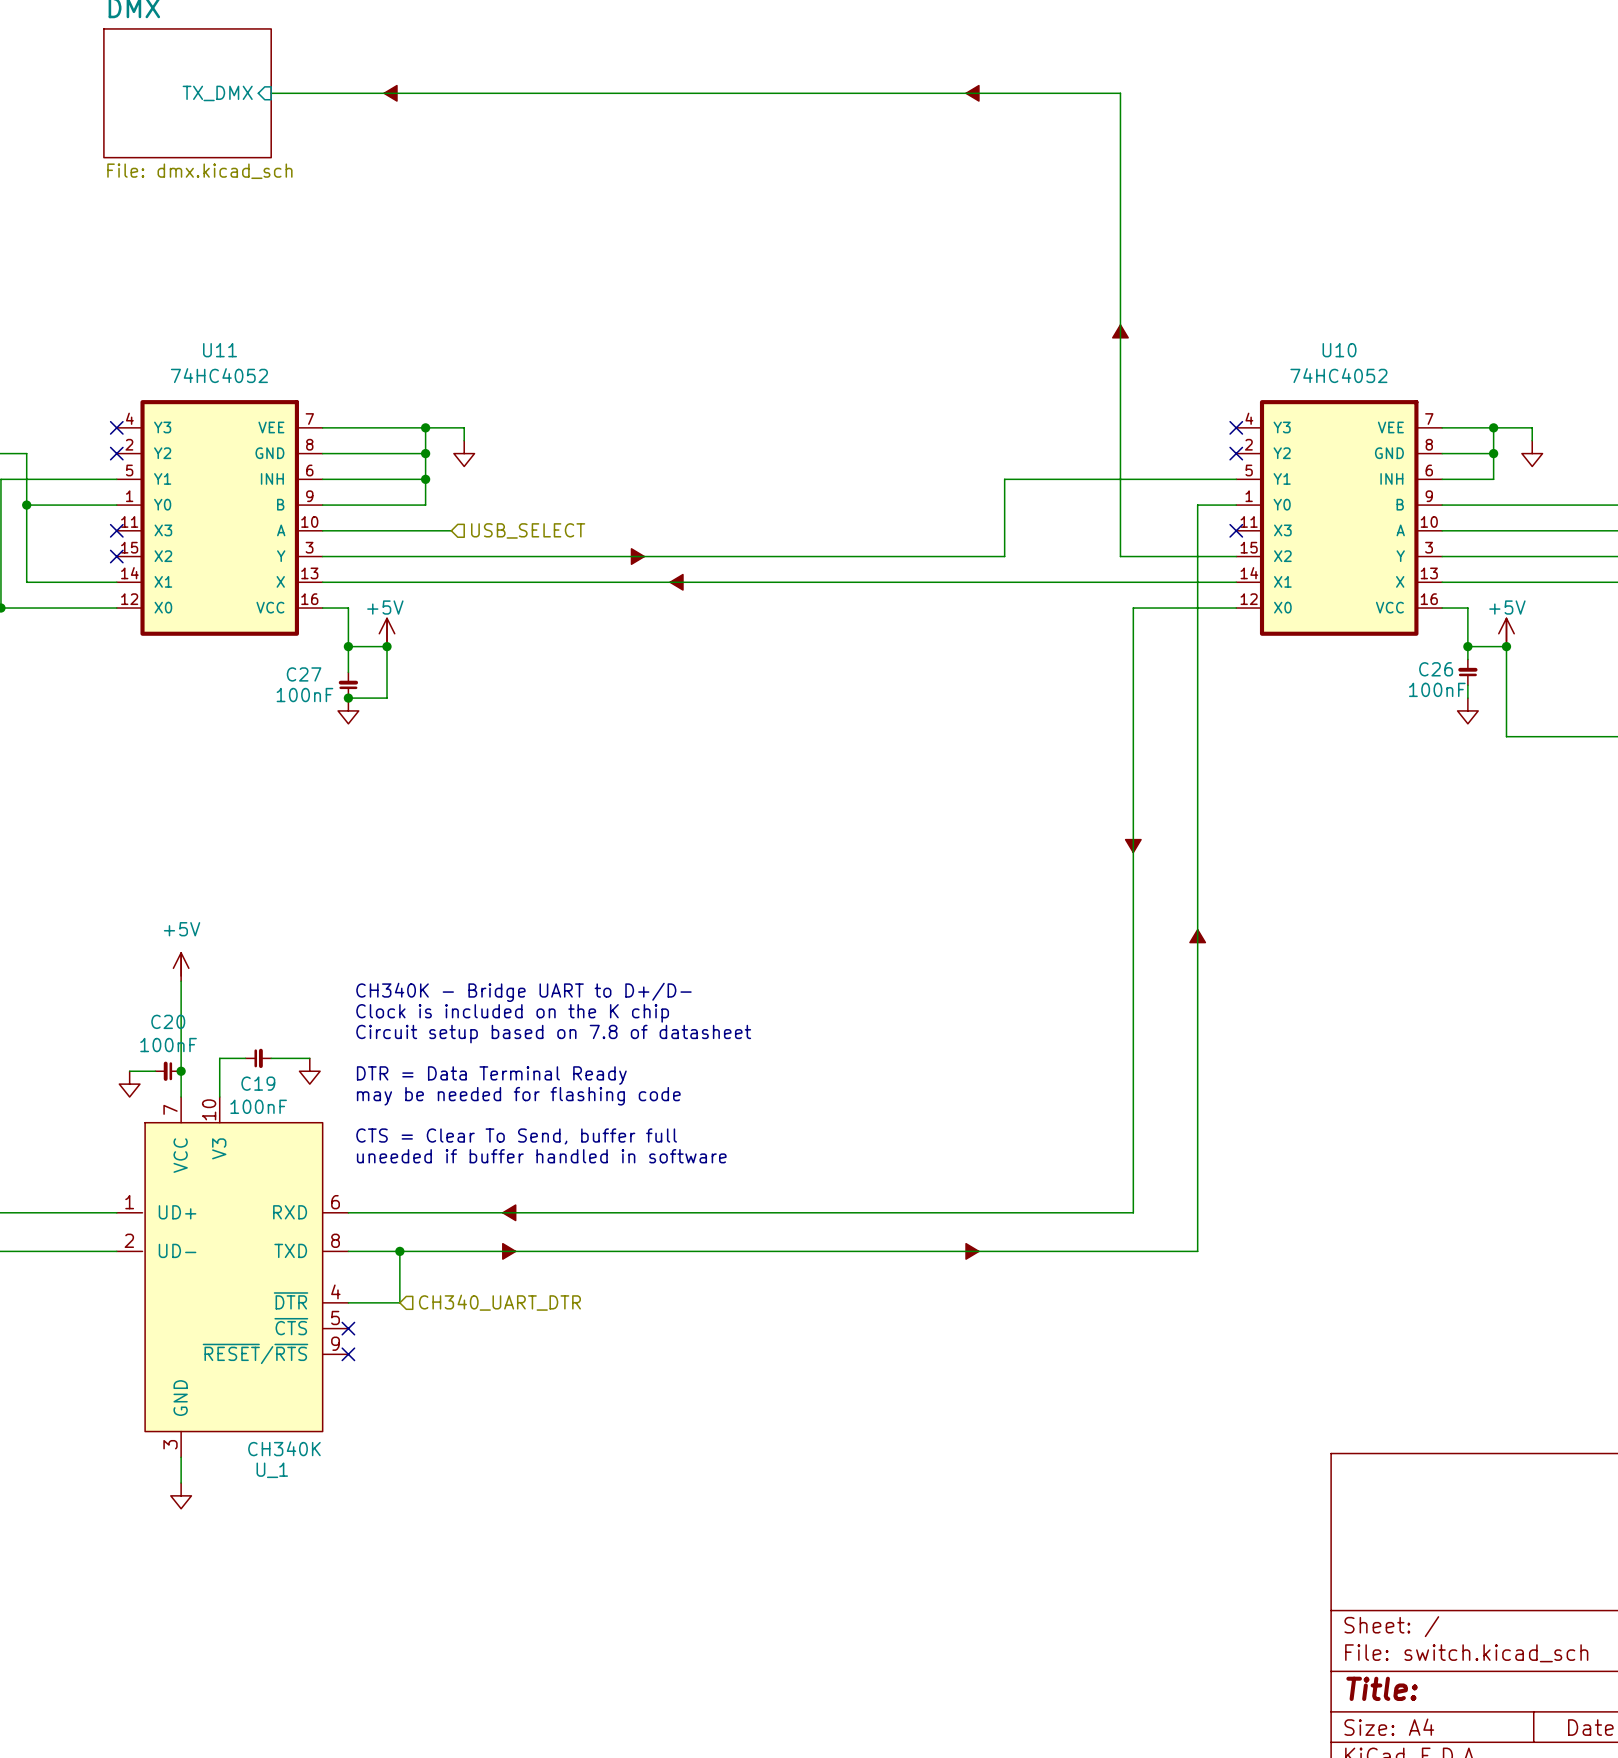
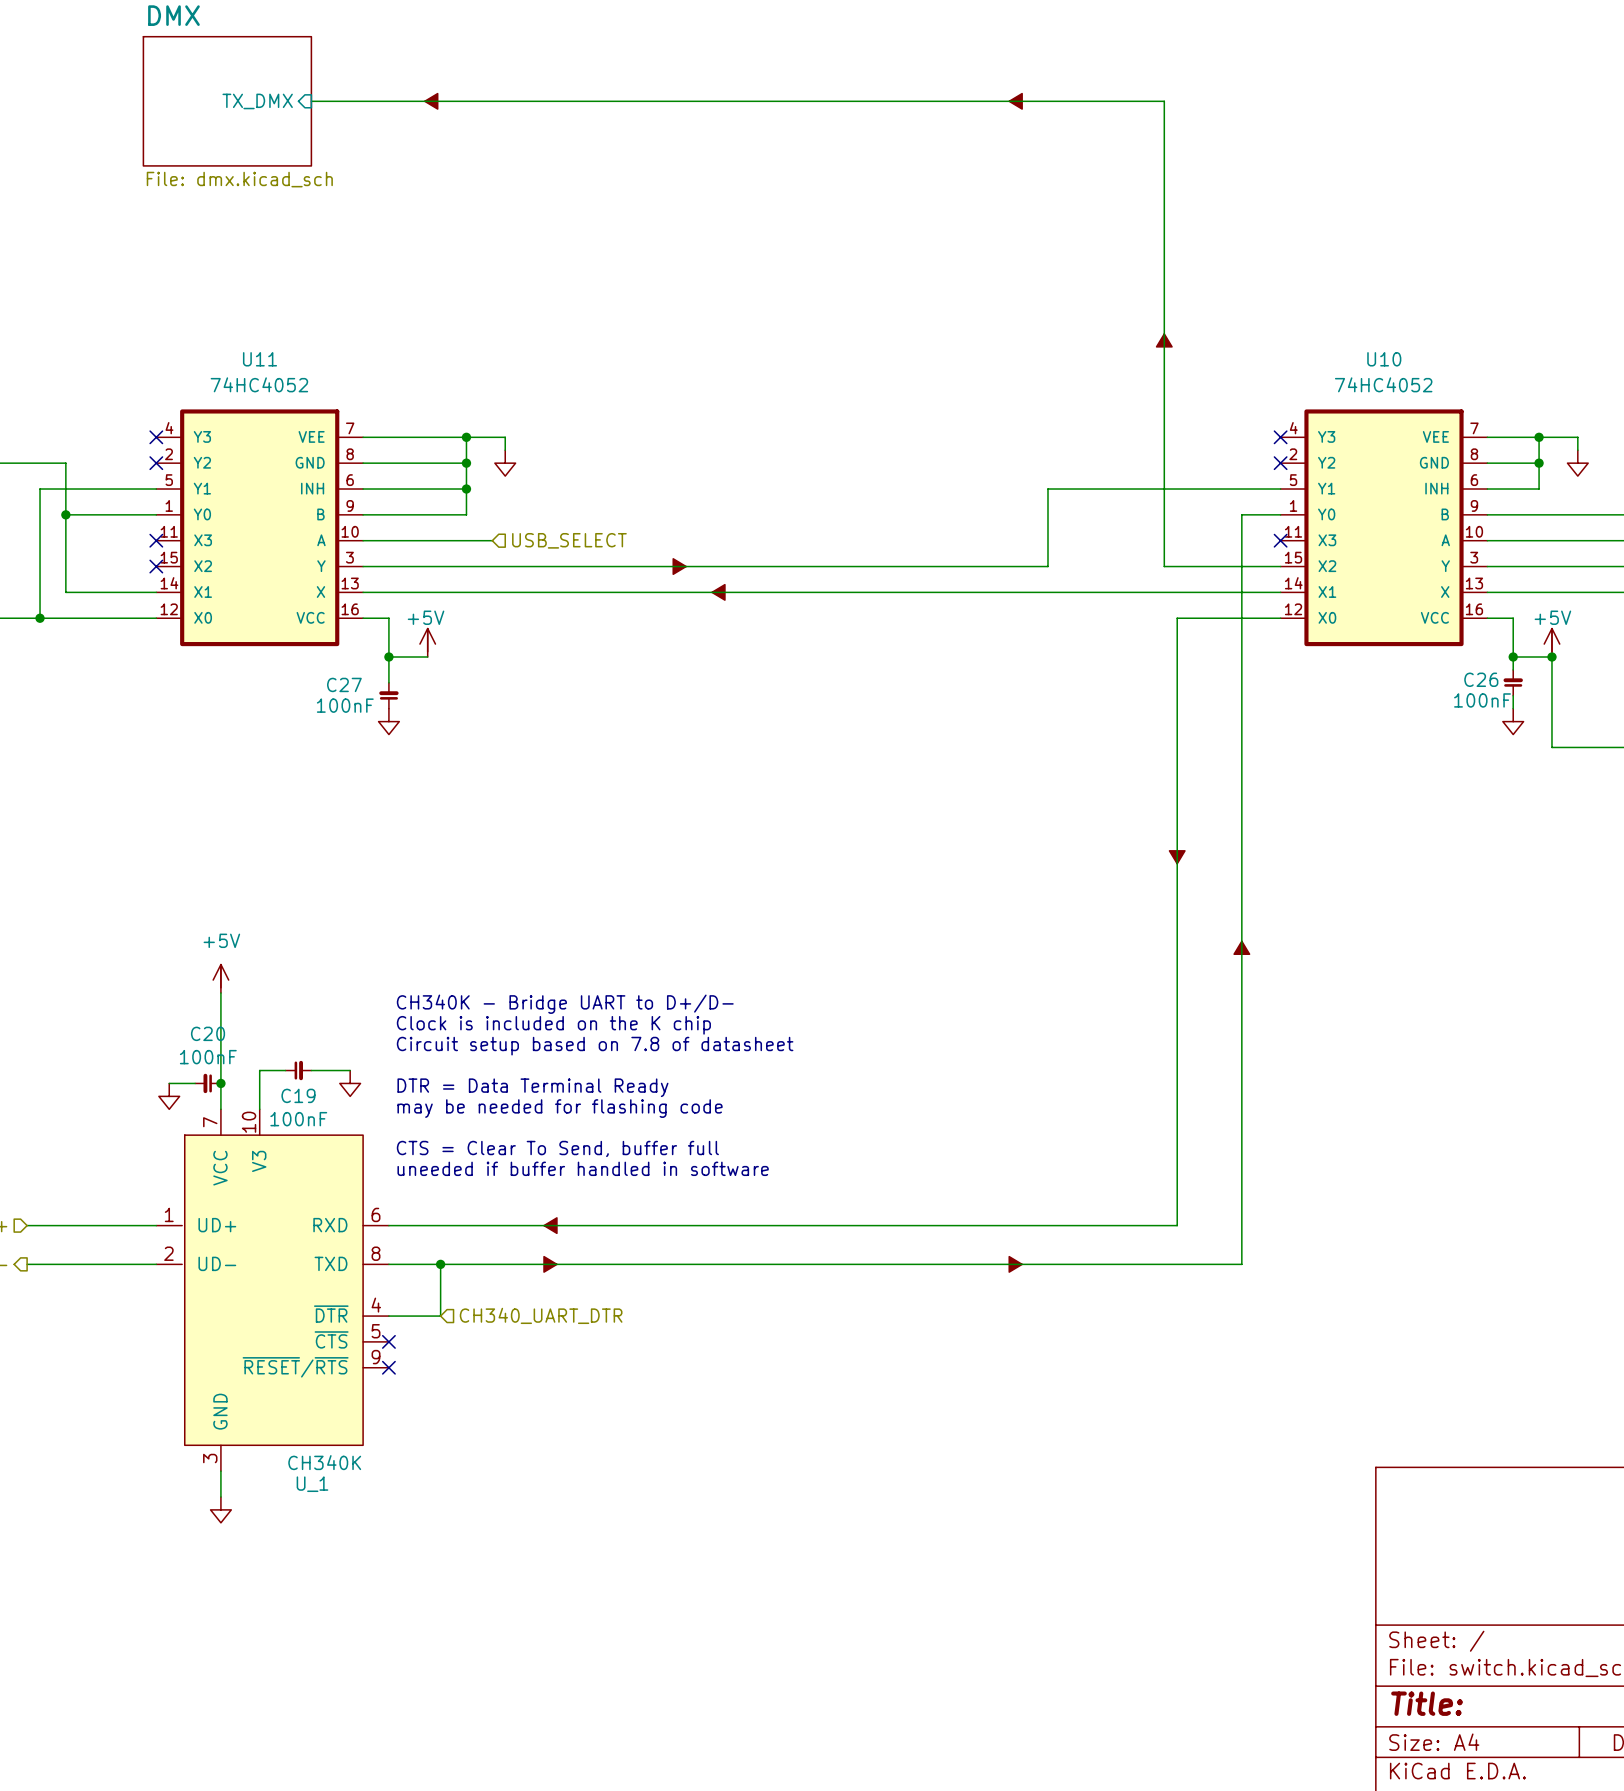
wire: (387, 646) (387, 698) (348, 698) -> none
junction: (387, 646) -> none
junction: (348, 698) -> none

